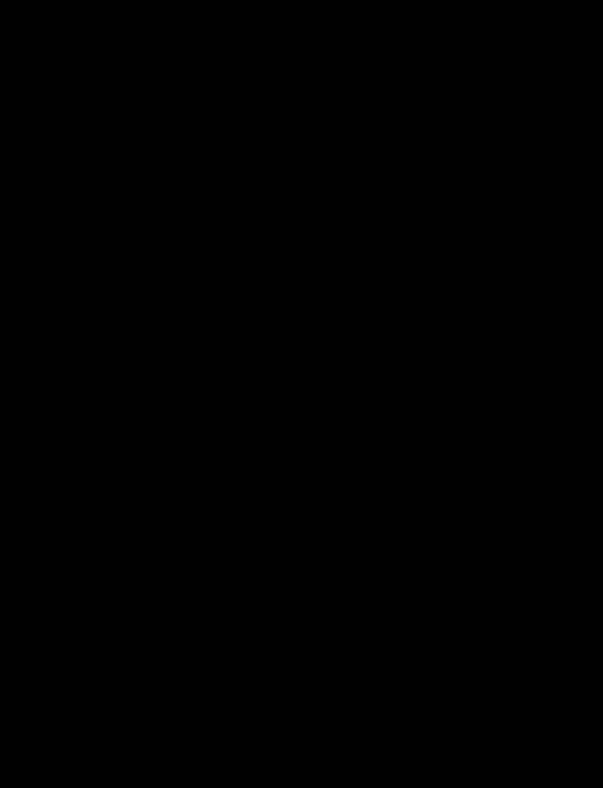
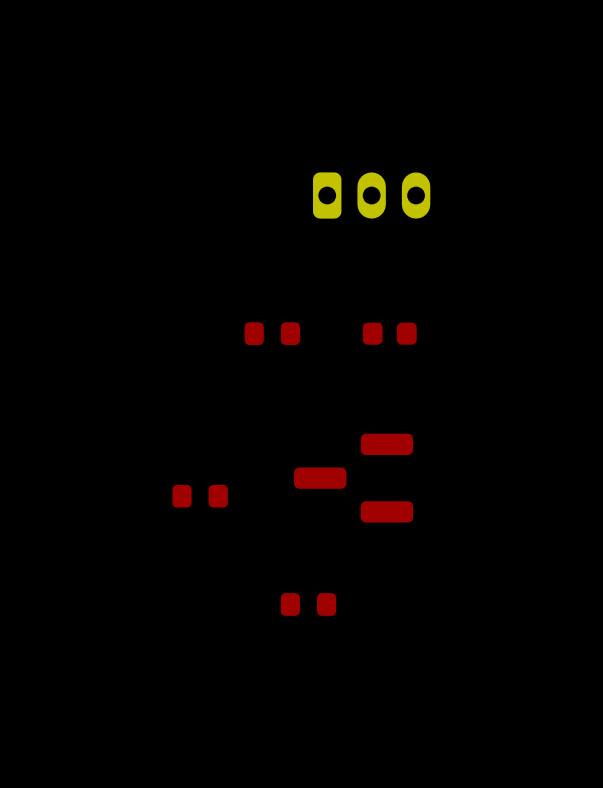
part: none -> (371, 195)
part: none -> (272, 333)
part: none -> (389, 333)
part: none -> (353, 478)
part: none -> (200, 496)
part: none -> (308, 604)

